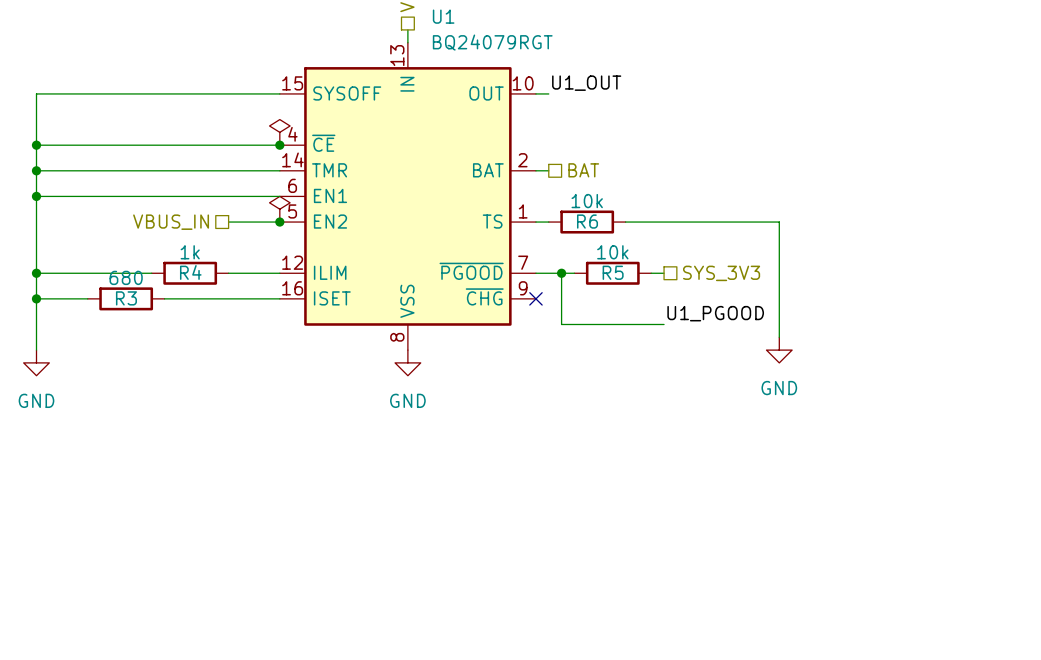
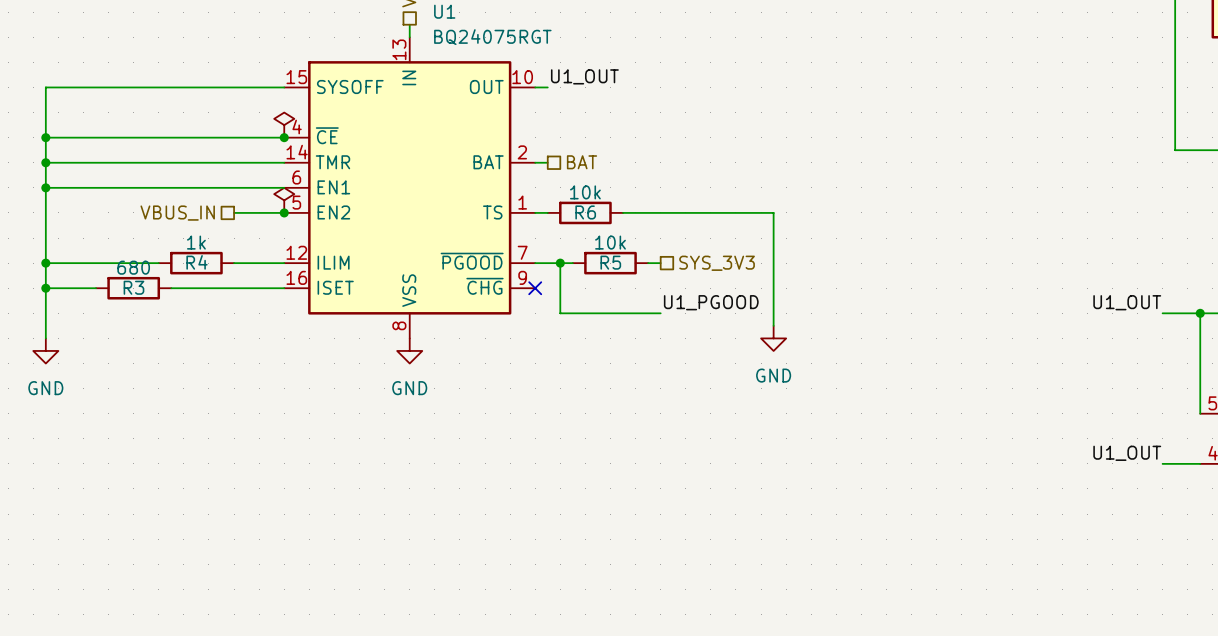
U1 value: BQ24079RGT (492, 42) -> BQ24075RGT (492, 37)

